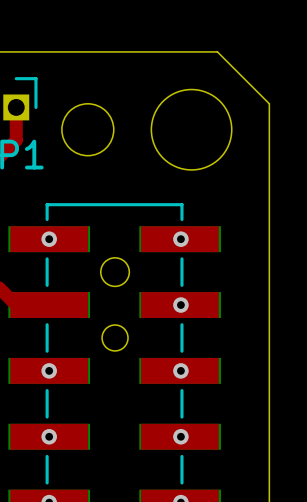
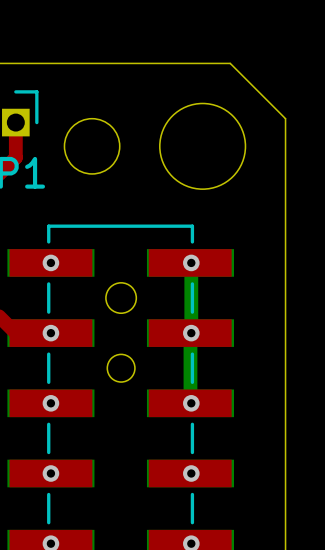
bottom track: none -> (191, 262) (191, 333)
via: none -> (50, 333)
bottom track: none -> (190, 333) (191, 403)

